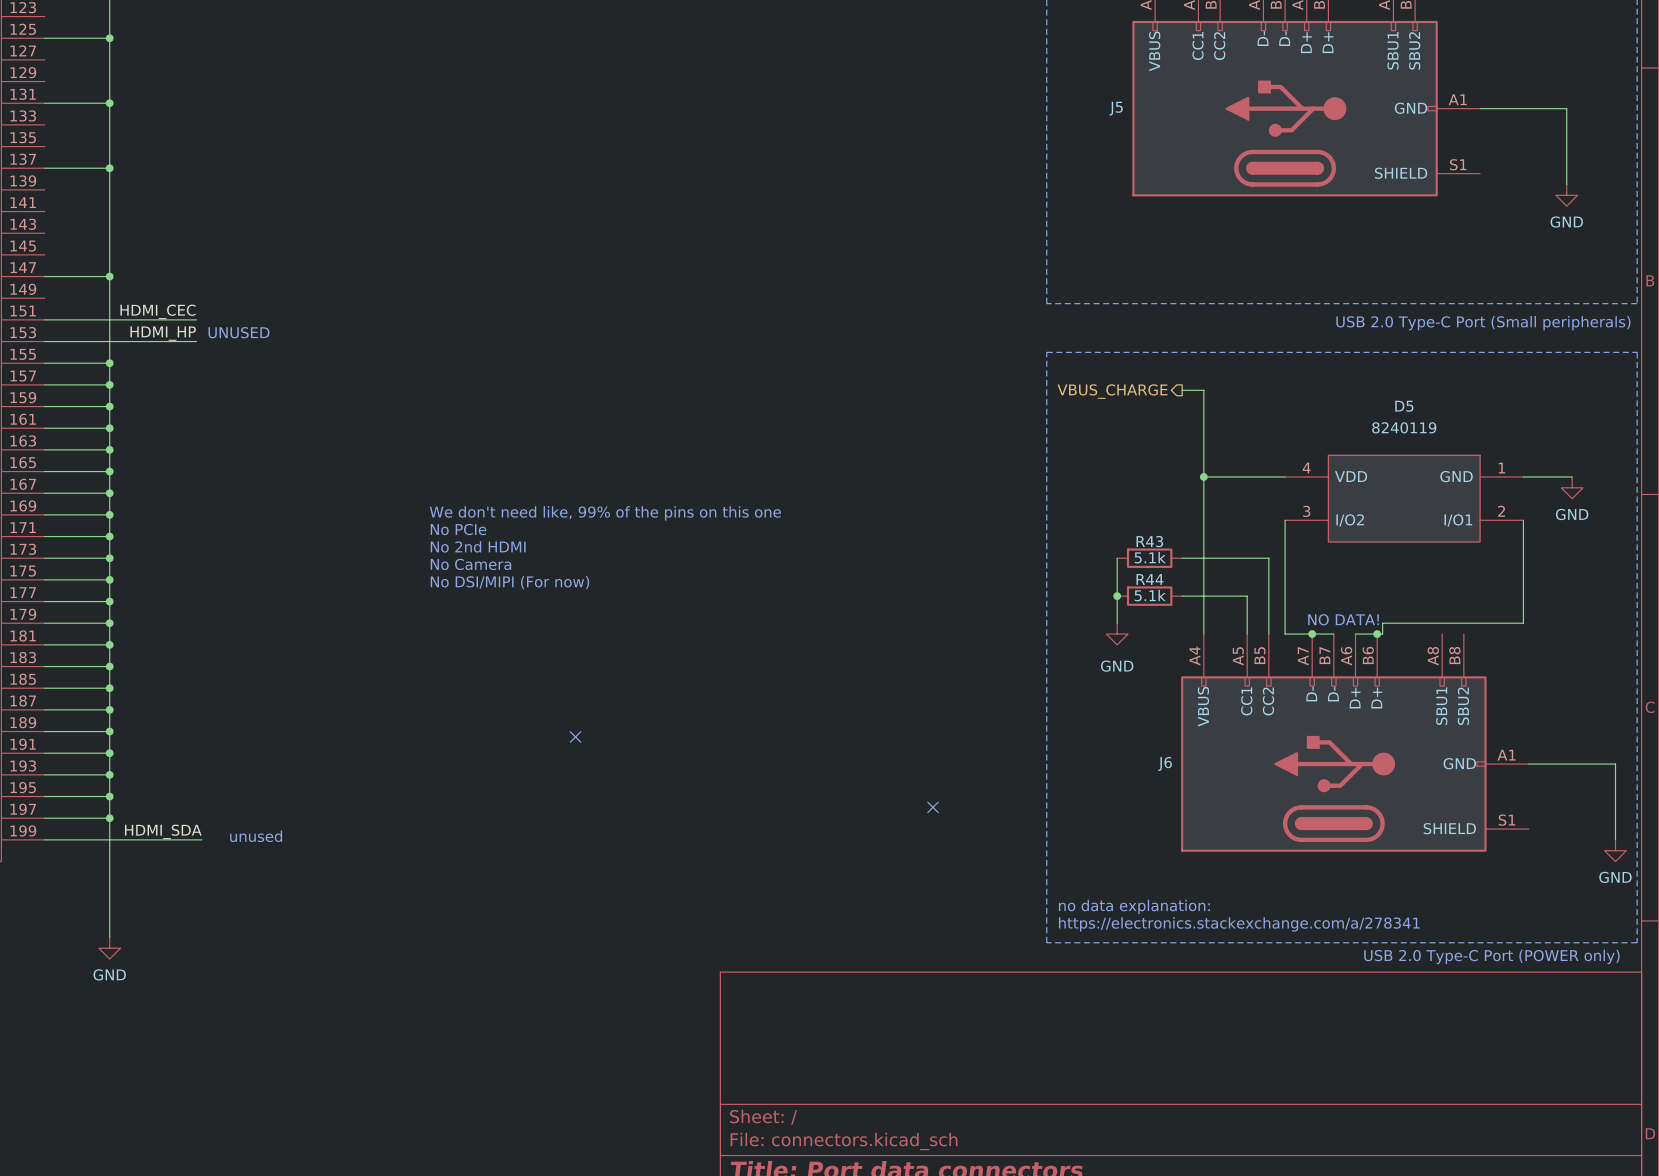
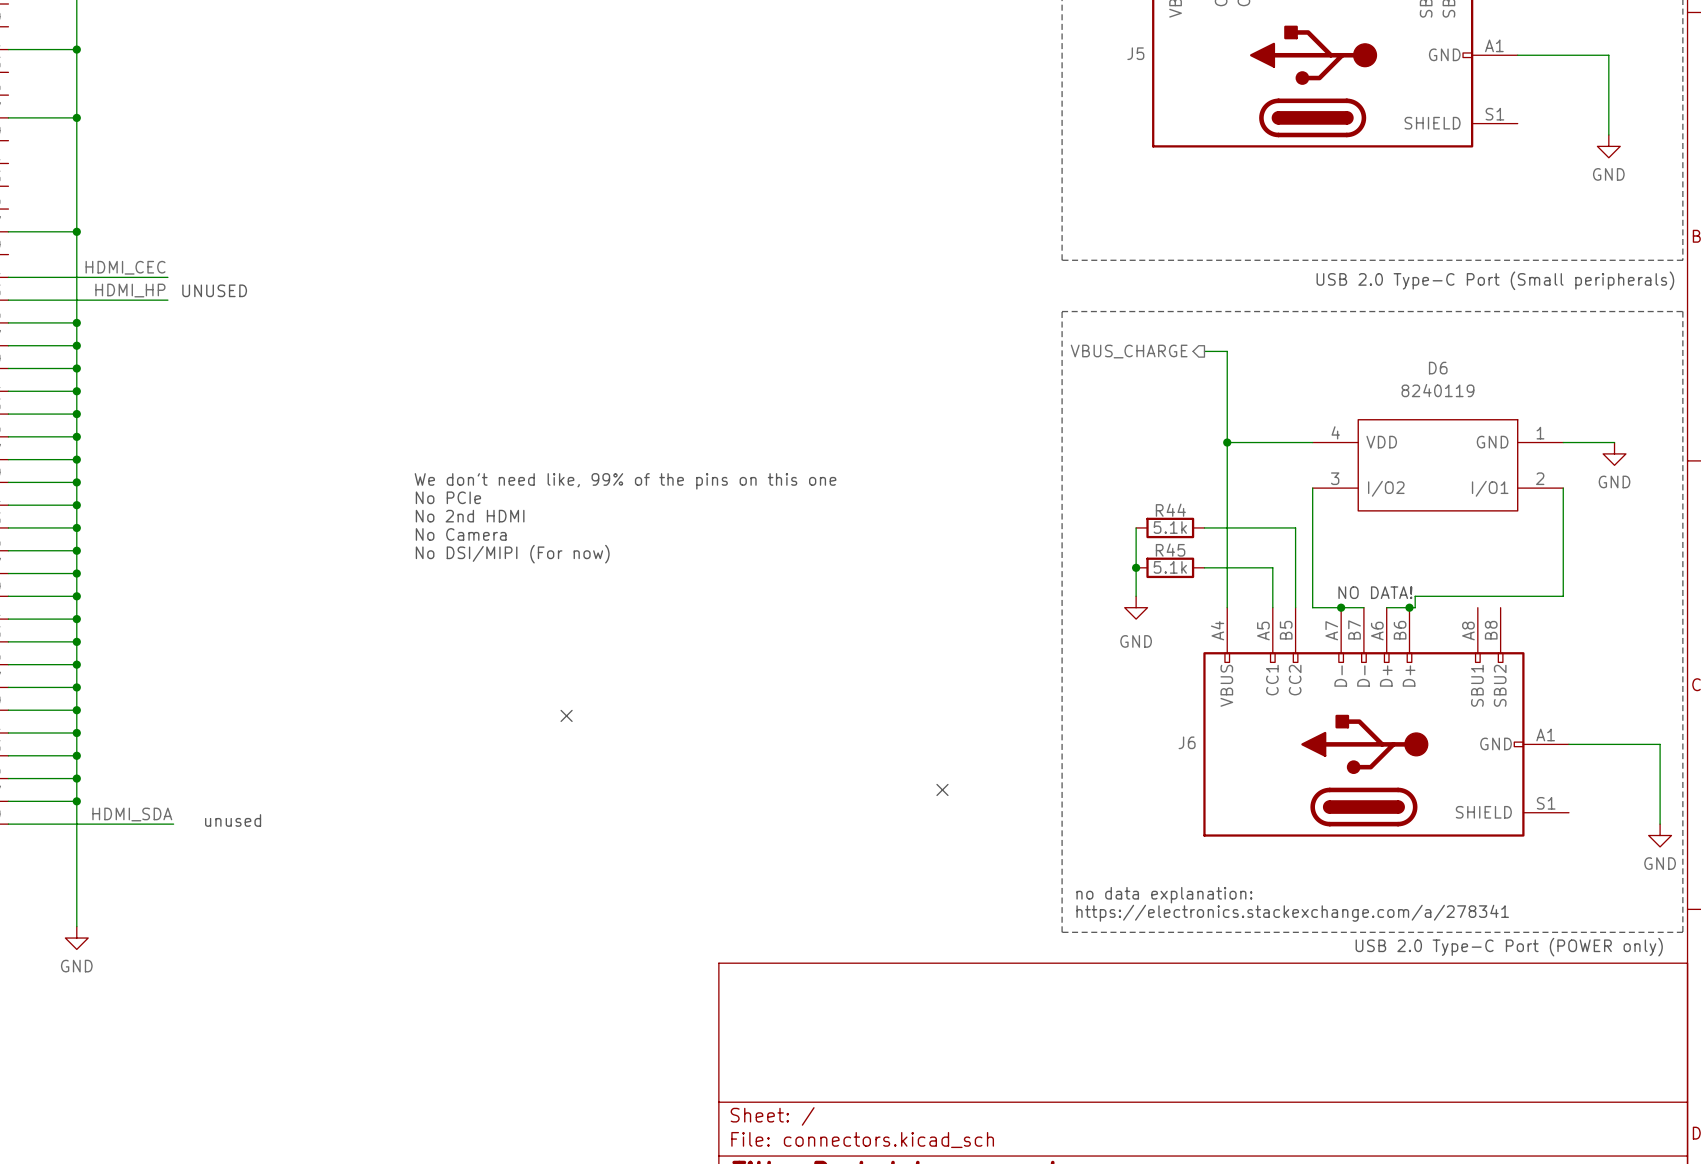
D5 name: D5 (1404, 406) -> D6 (1438, 368)
R43 name: R43 (1149, 541) -> R44 (1170, 510)
R44 name: R44 (1149, 579) -> R45 (1170, 550)

